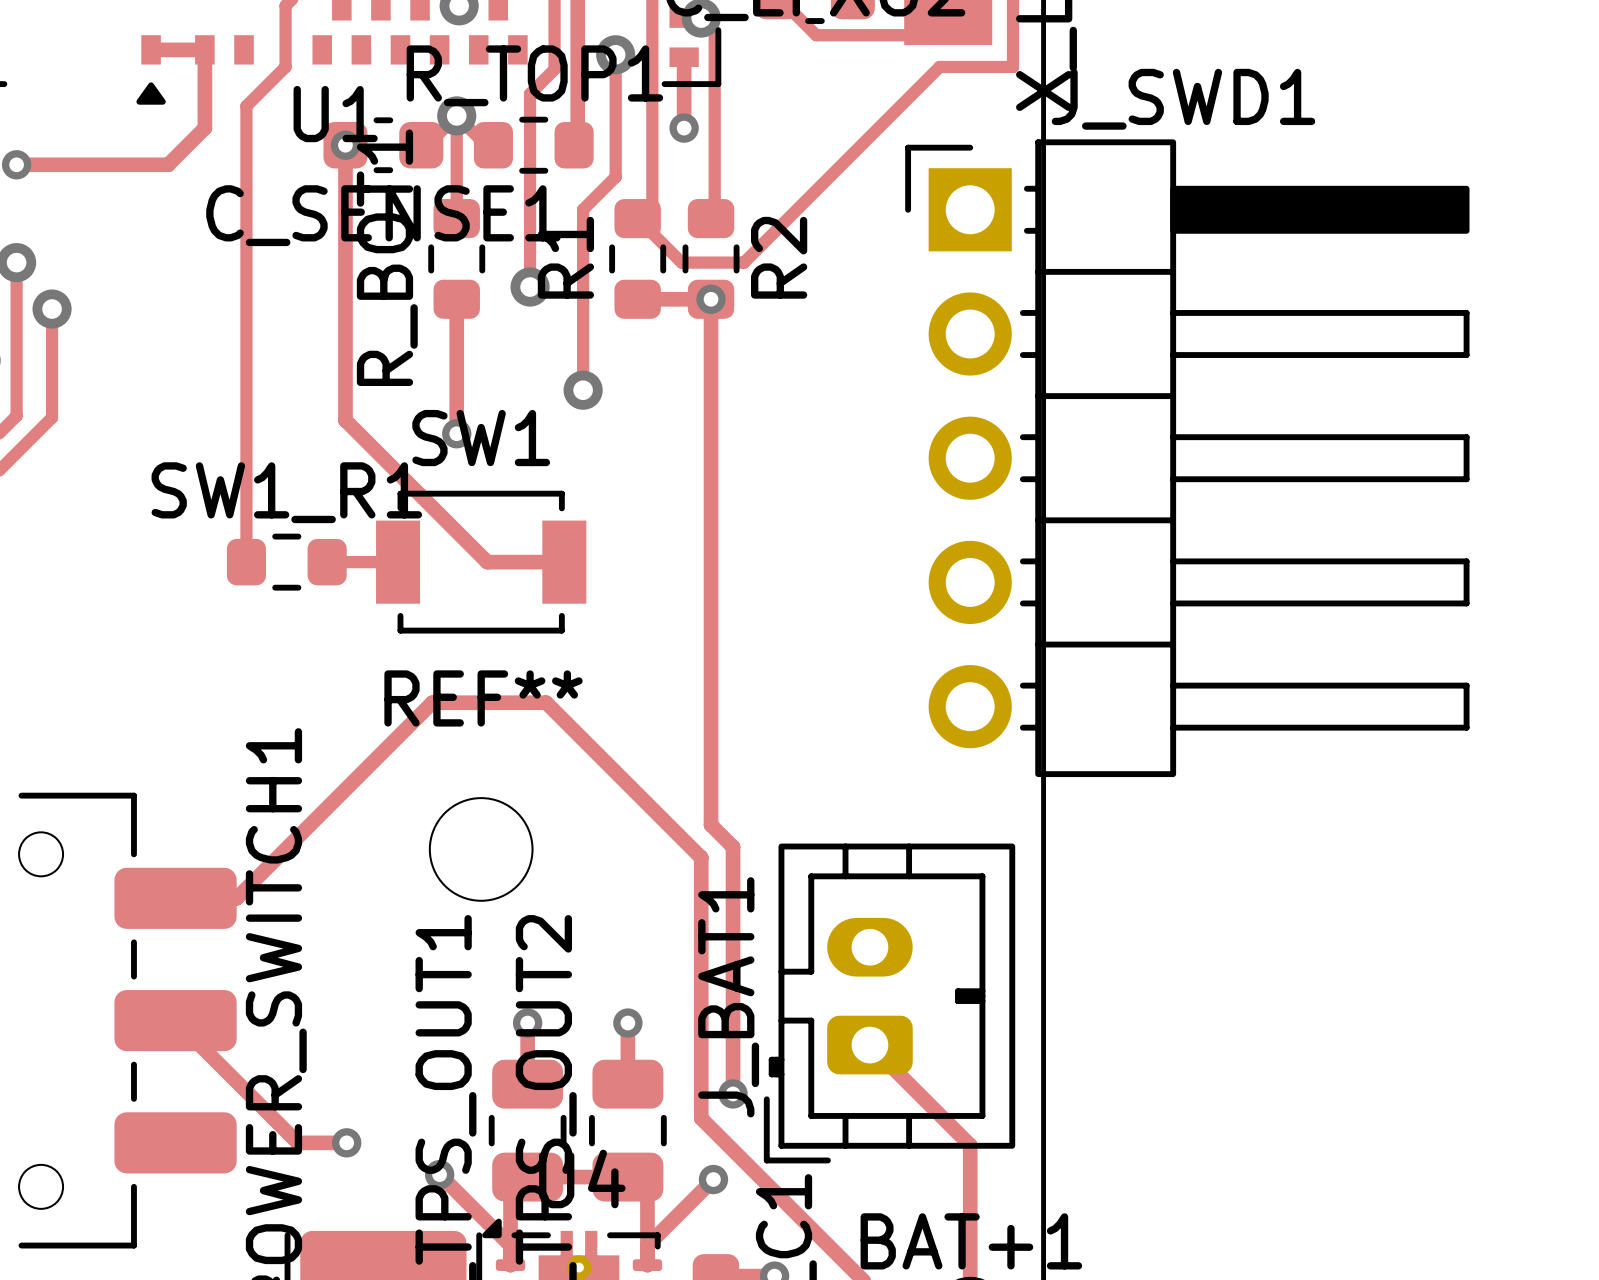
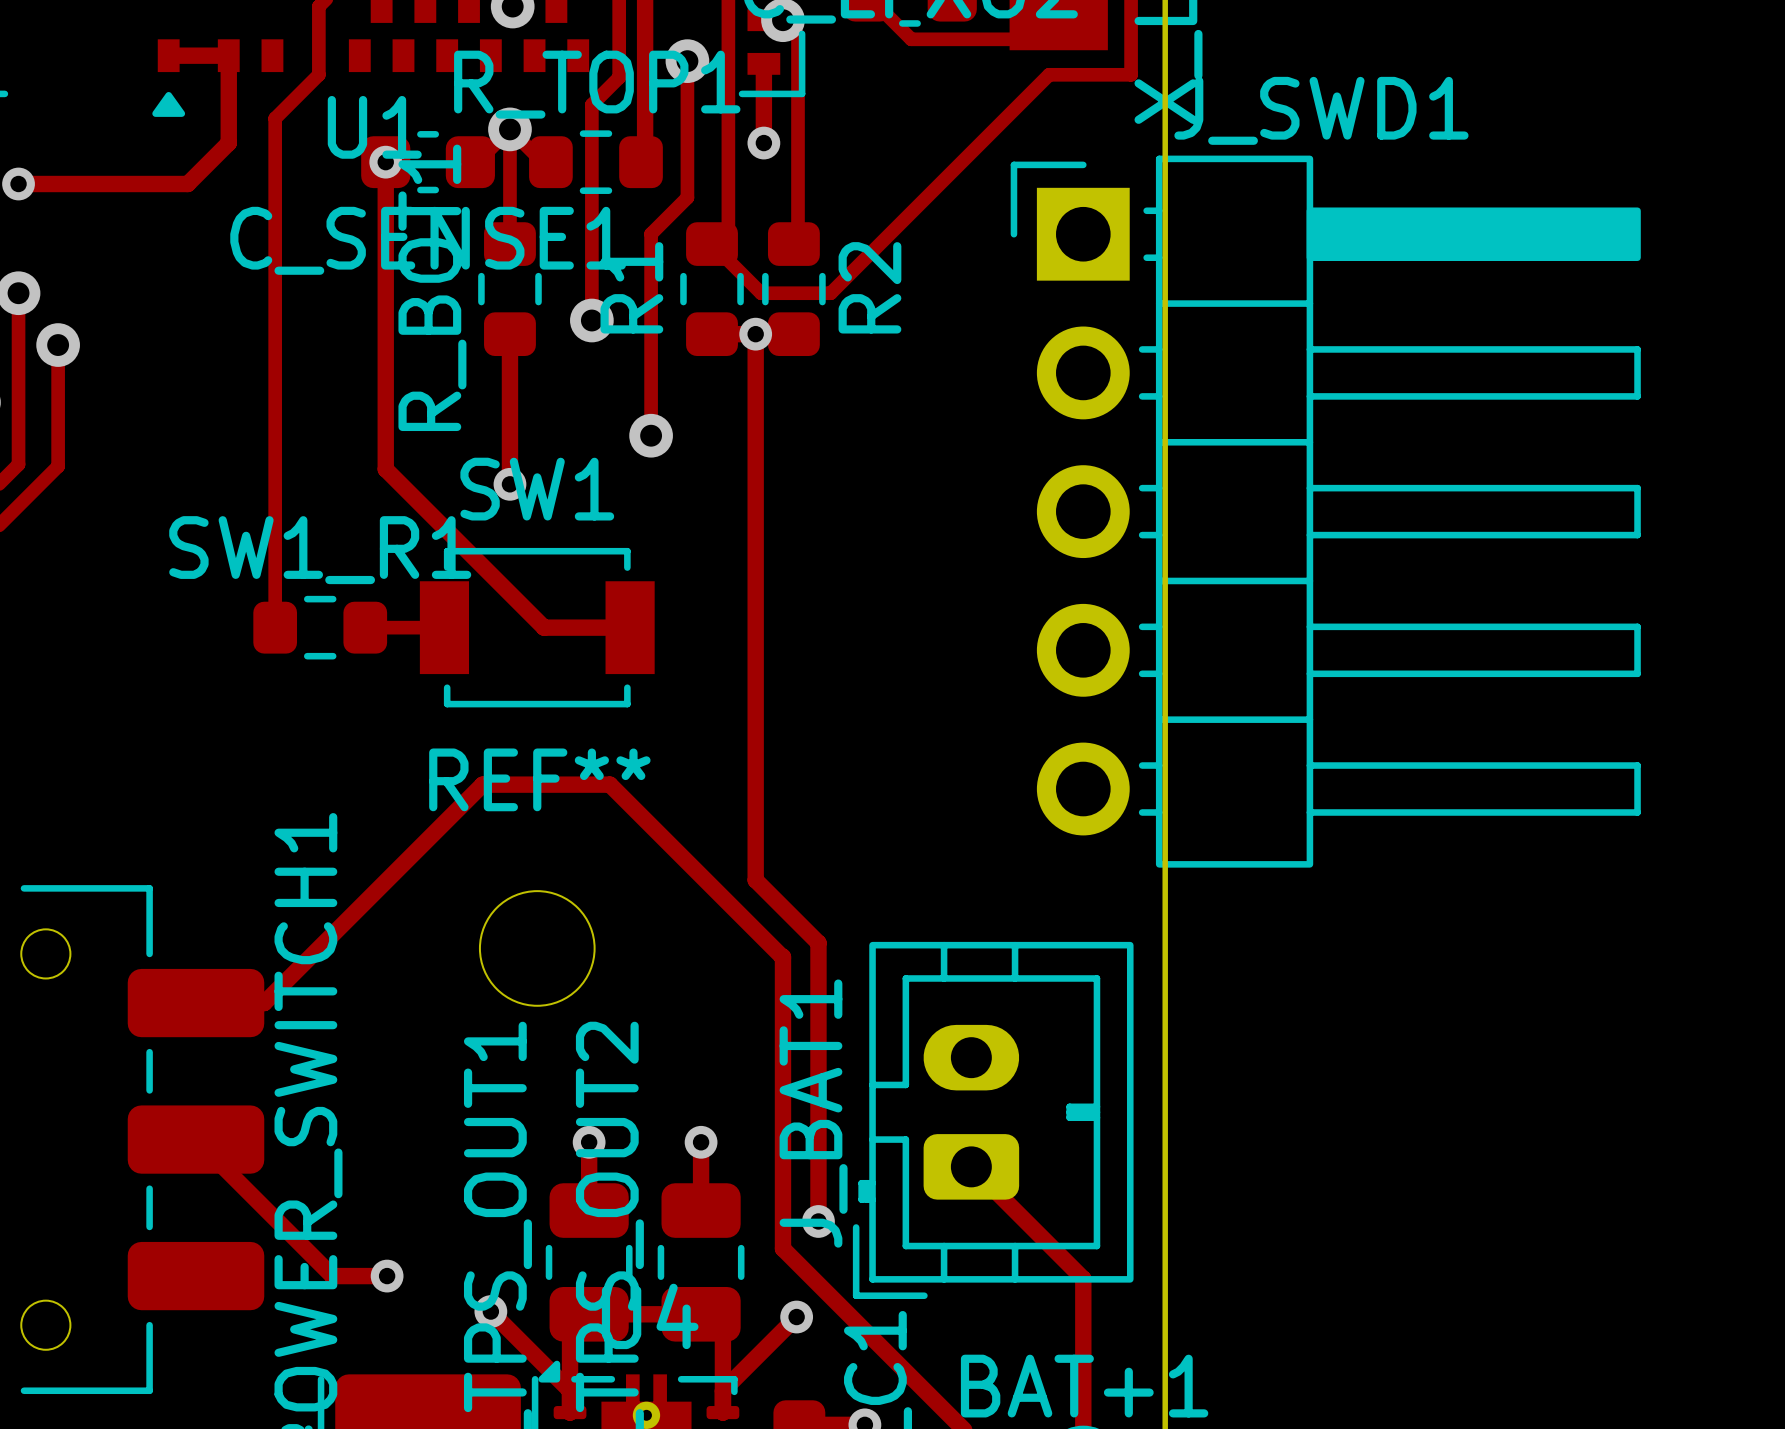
track: (711, 299) (711, 824) (733, 846) -> (755, 334) (755, 880) (818, 942) (818, 945)
via position: (711, 299) -> (755, 334)

